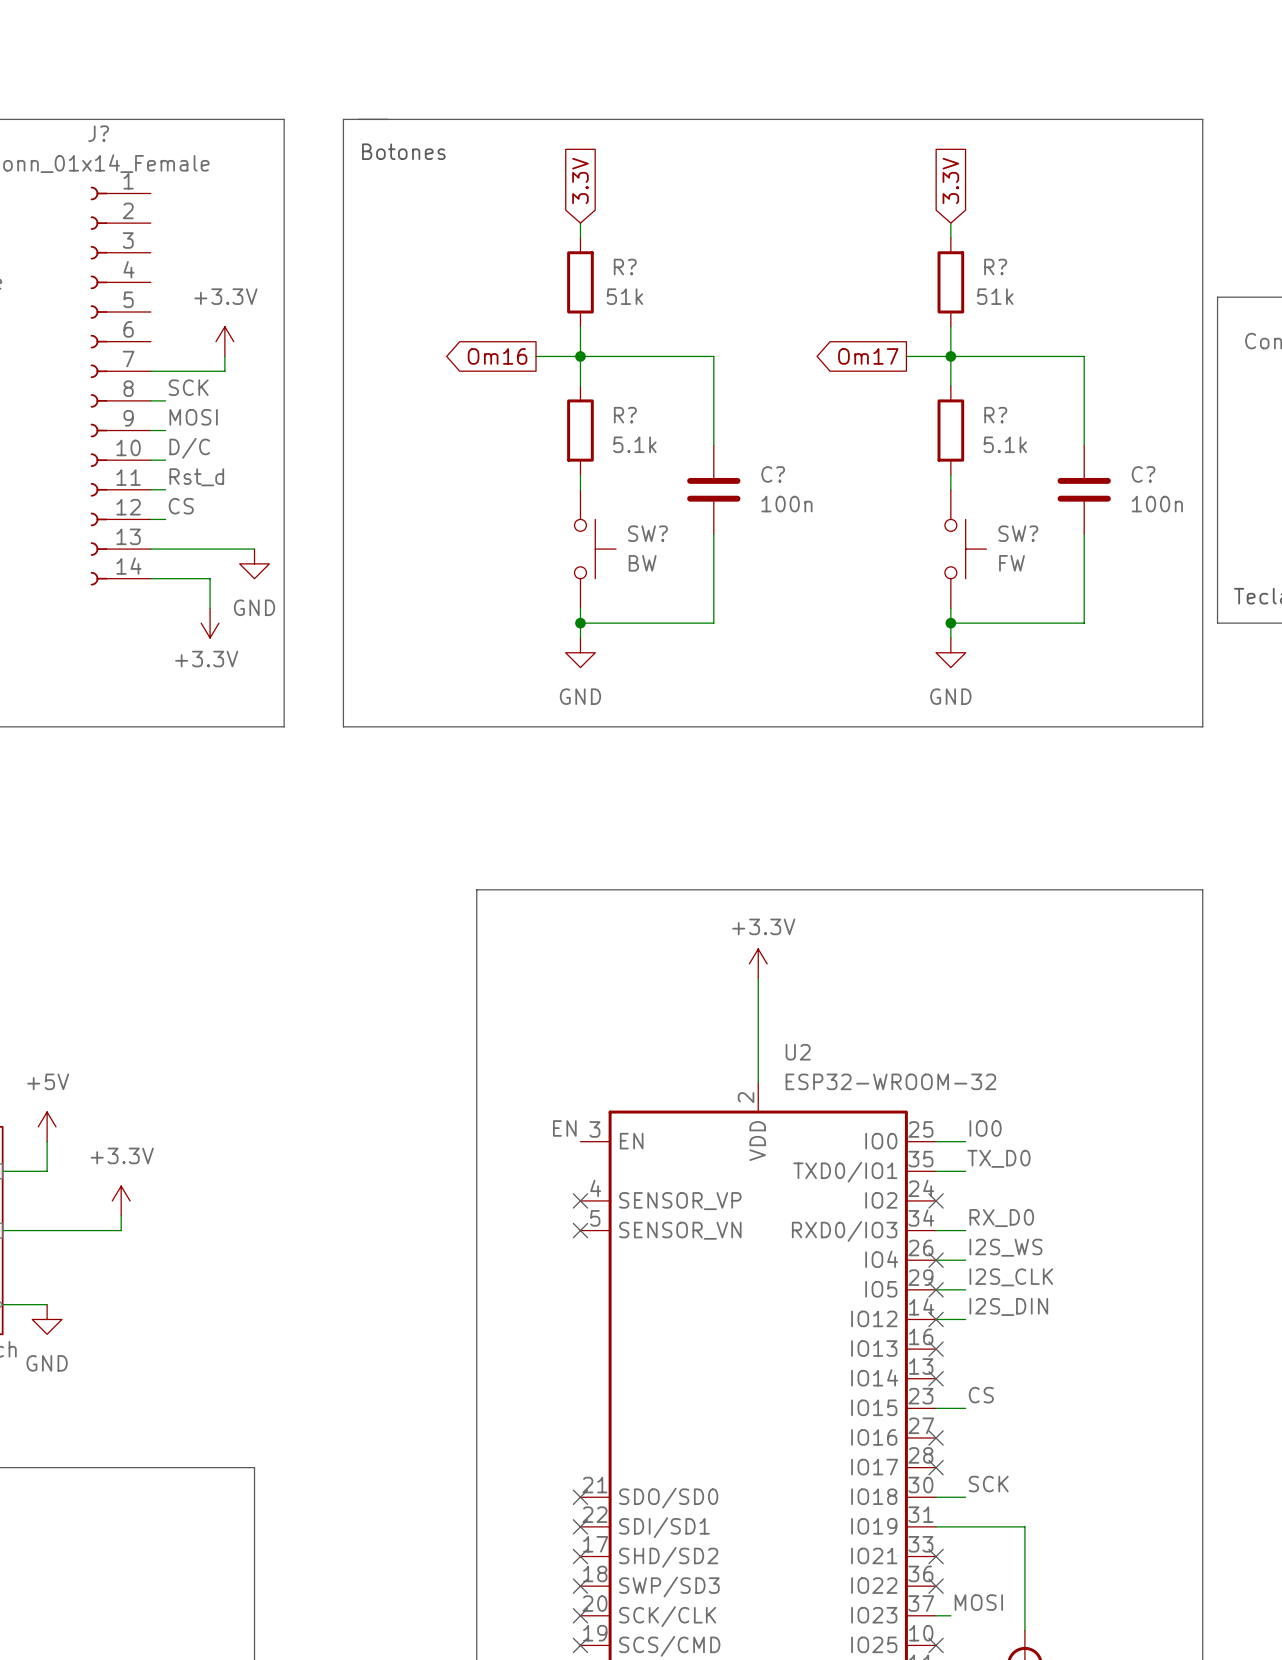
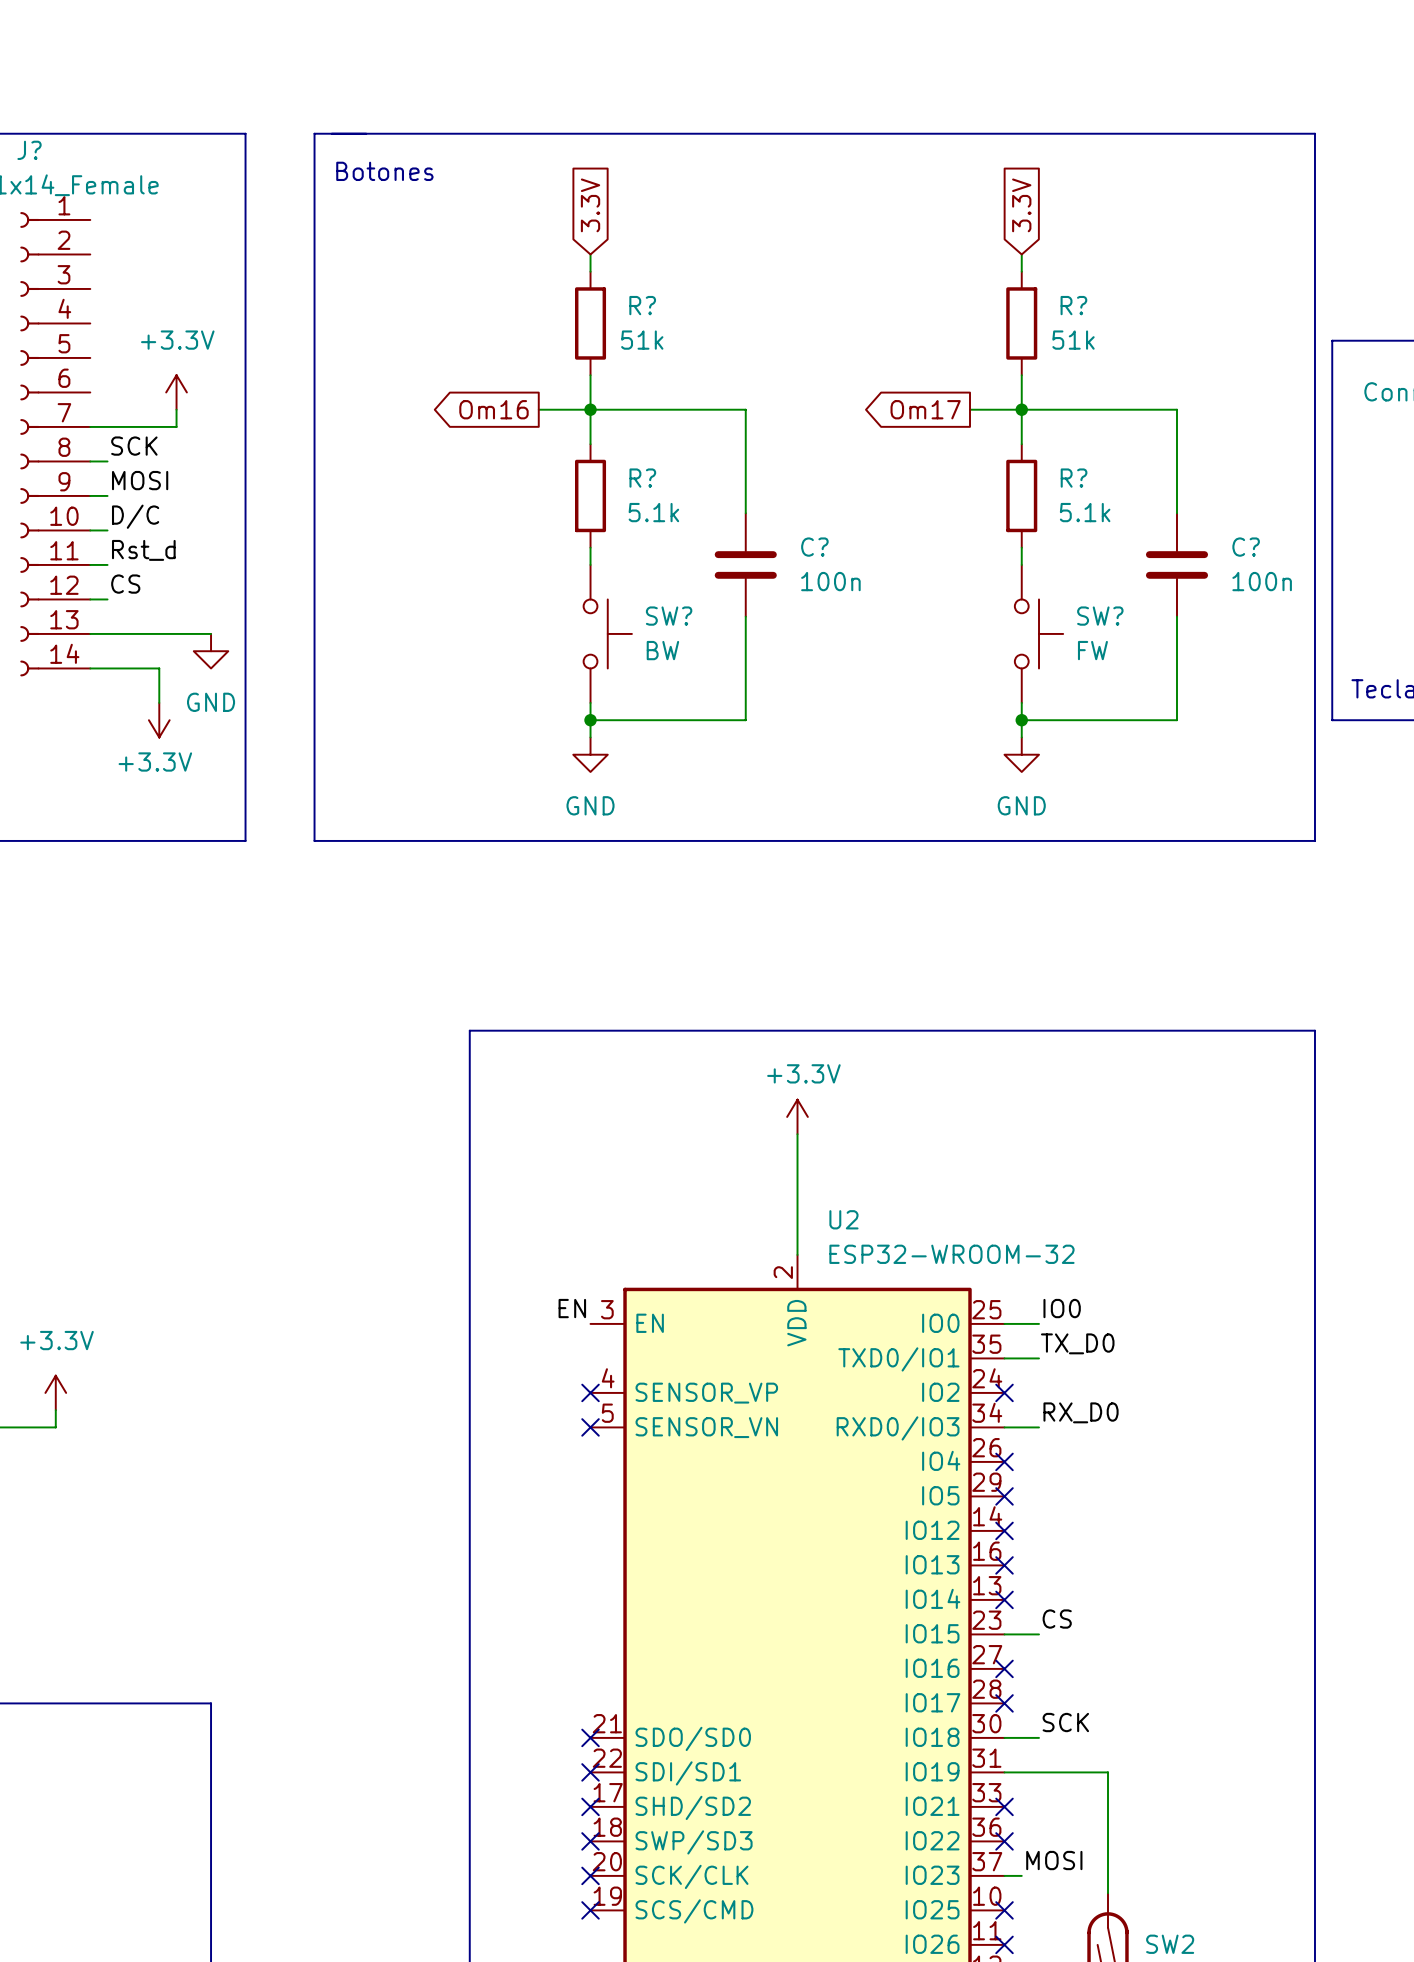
label: I2S_WS (1006, 1247) -> none
wire: (936, 1260) (965, 1260) -> none
label: I2S_CLK (1011, 1277) -> none
wire: (936, 1289) (965, 1289) -> none
label: I2S_DIN (1008, 1306) -> none
wire: (936, 1319) (965, 1319) -> none

